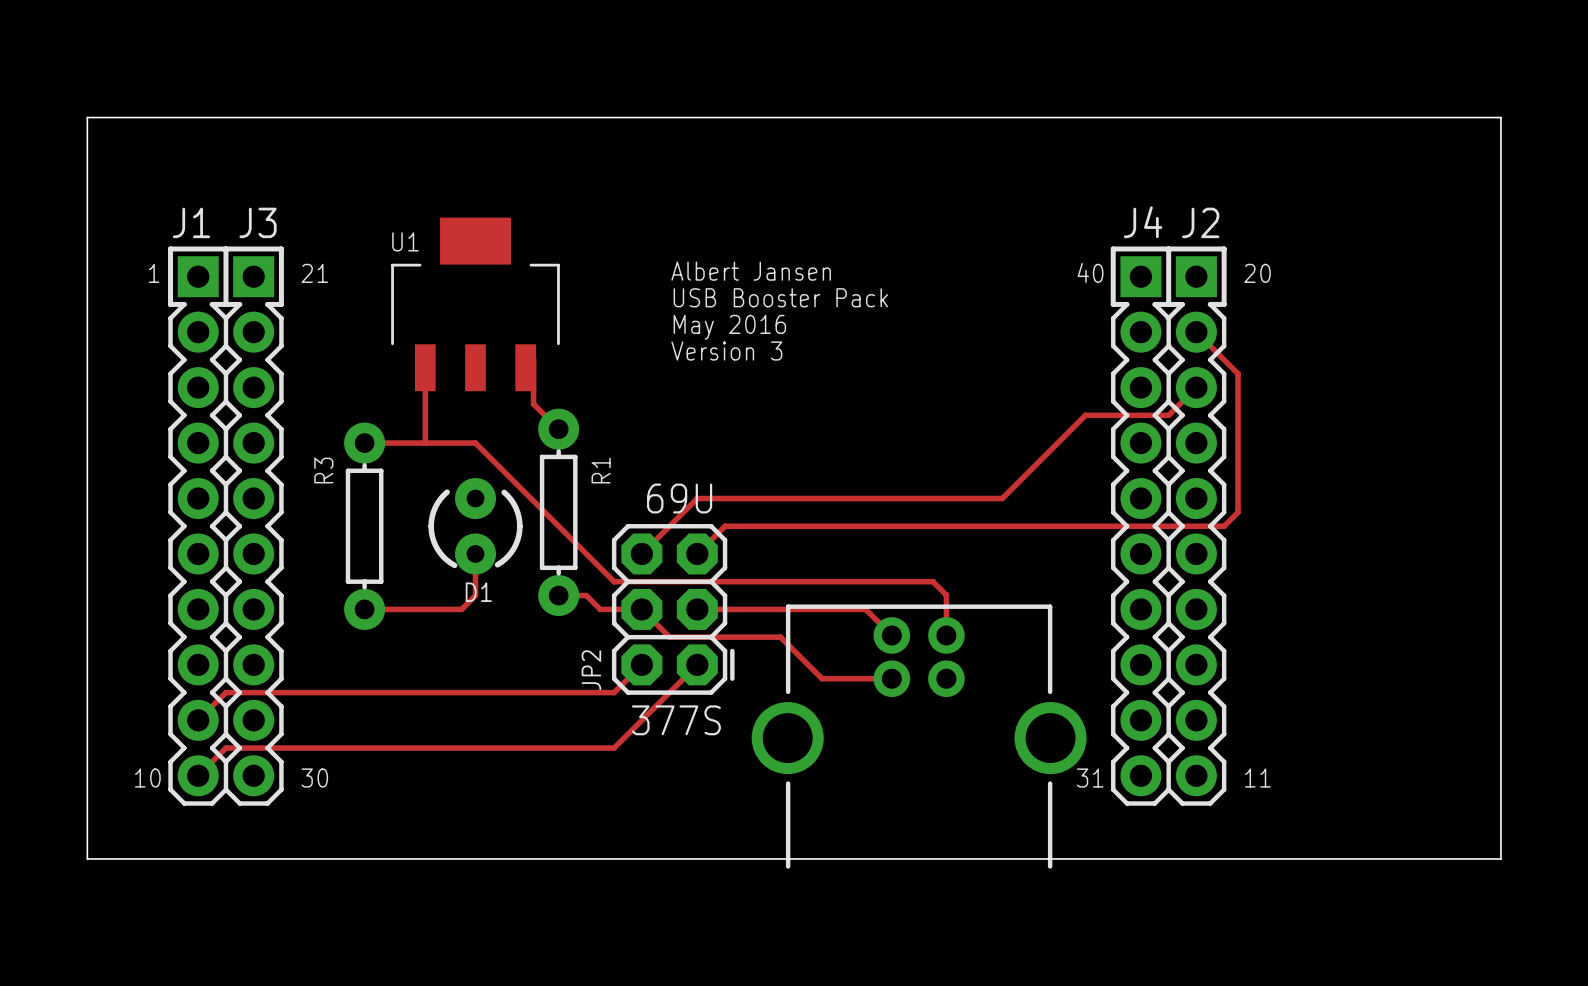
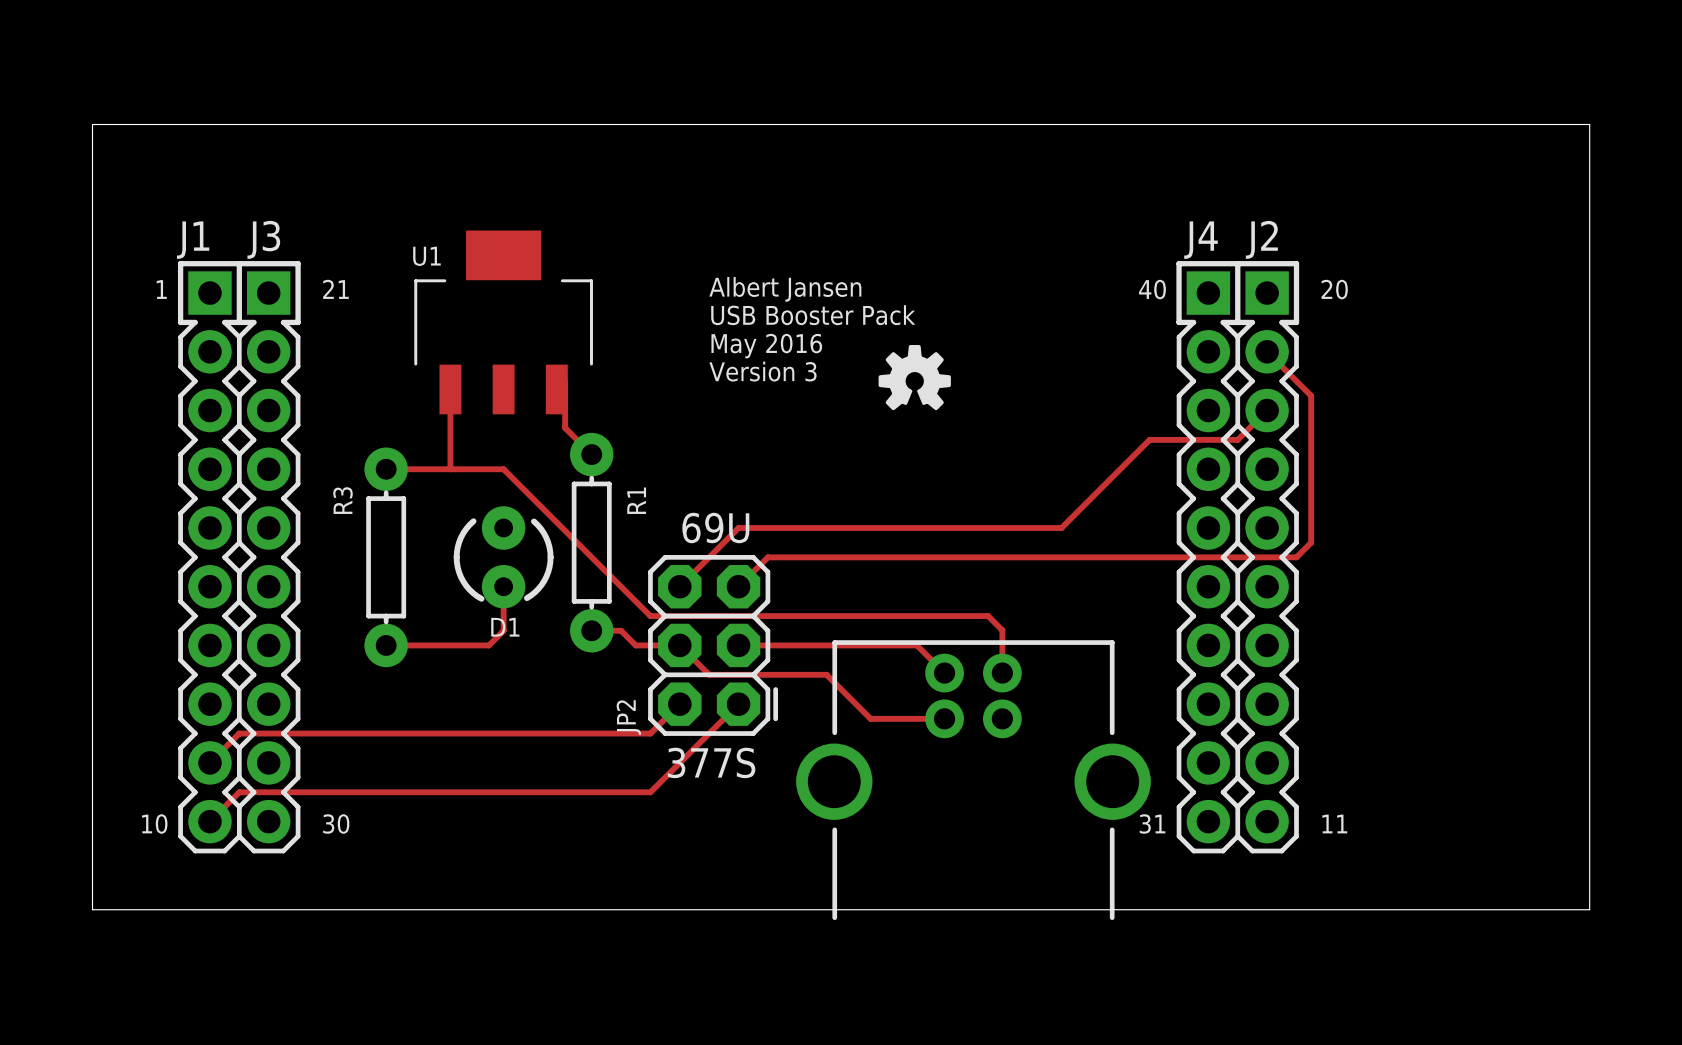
drawing: none -> [878, 345, 951, 411]

